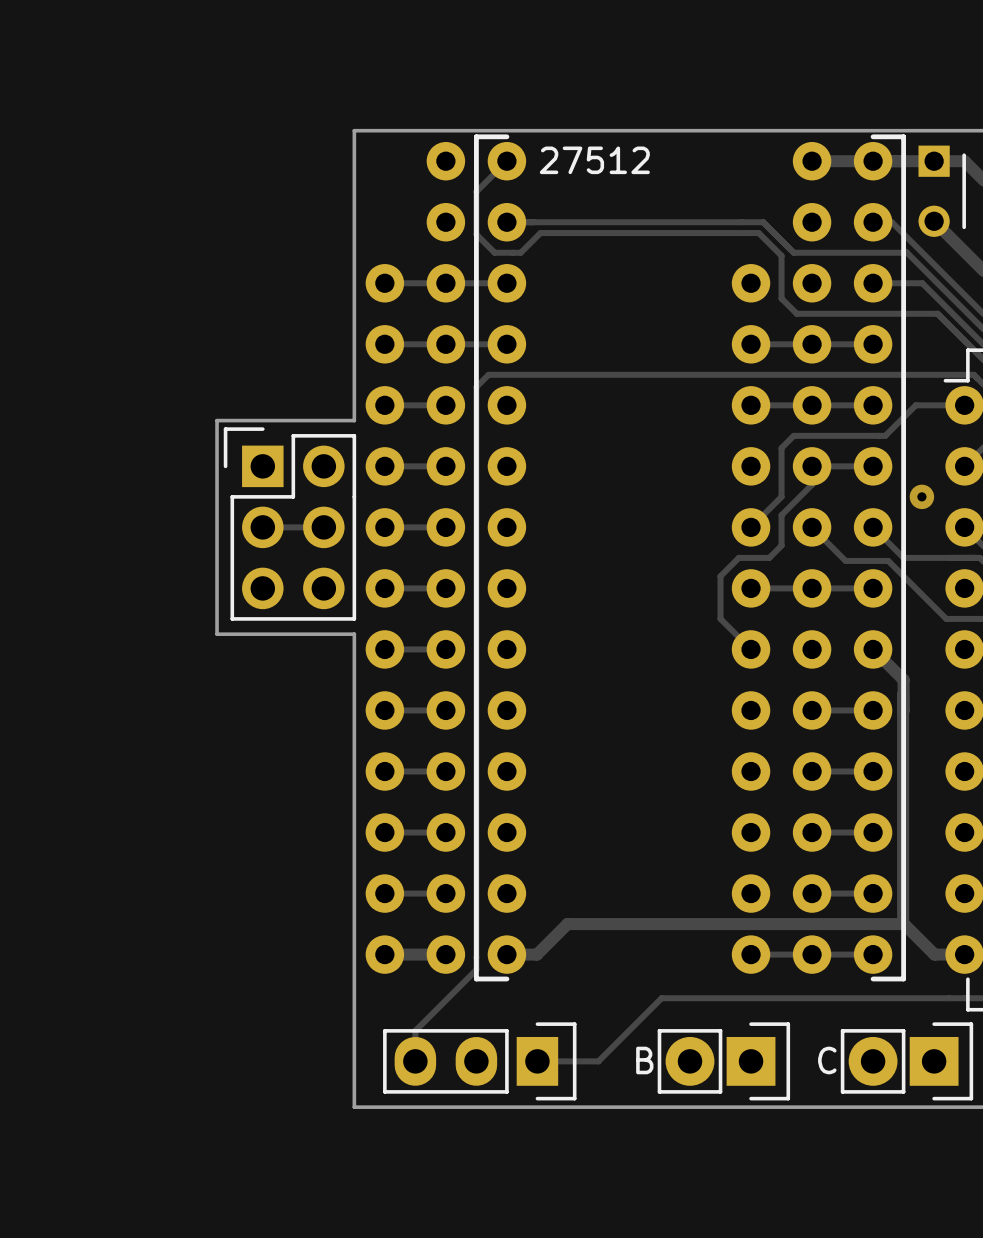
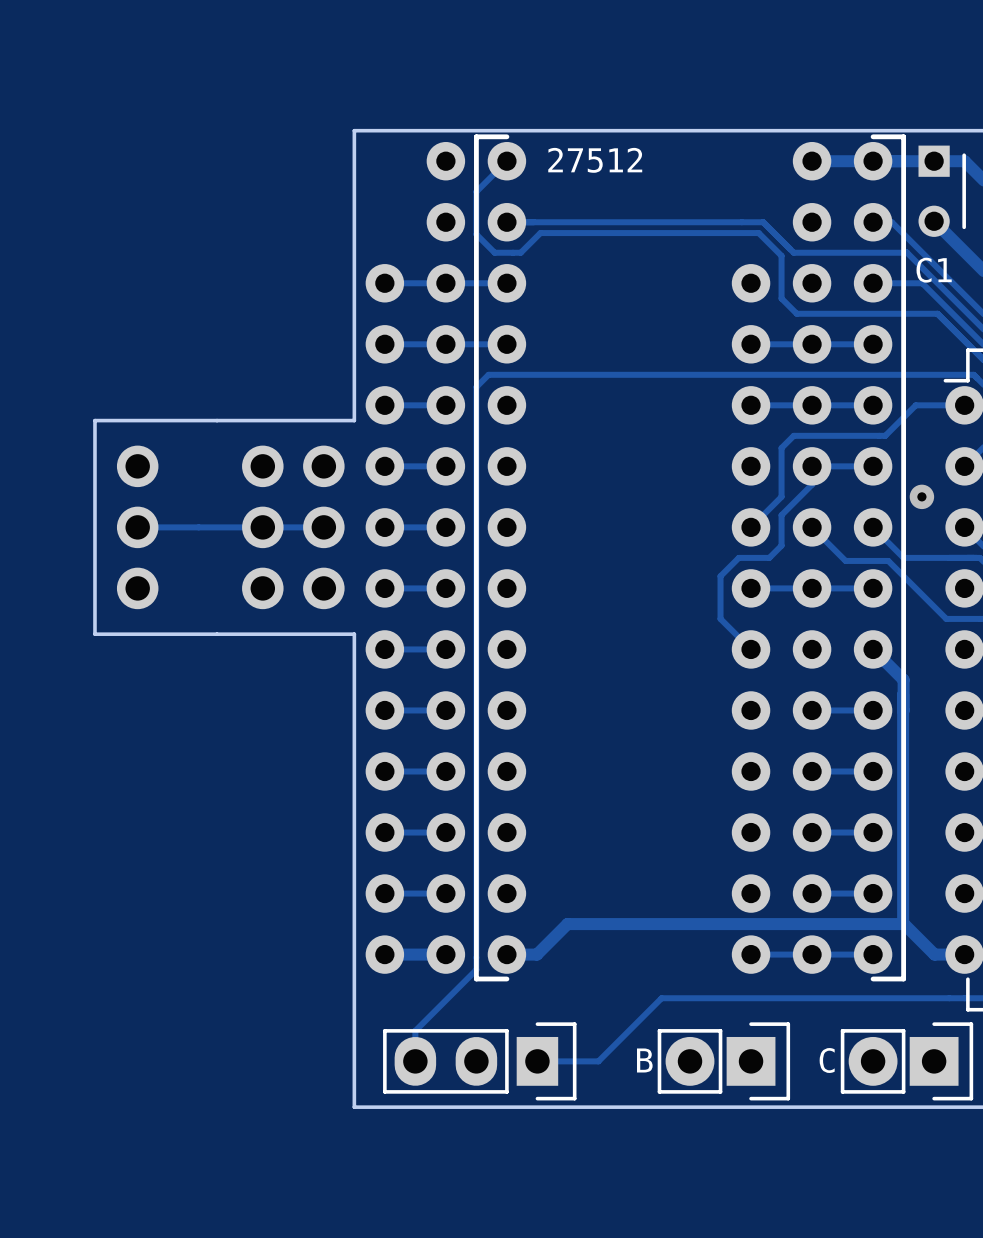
C1 name: none -> C1 (934, 270)
board edge: (217, 420) (217, 634) -> (217, 420) (94, 420) (94, 634) (217, 634)
part footprint: [223, 427, 357, 621] -> [242, 445, 345, 610]
track: none -> (137, 527) (262, 527)
part: none -> (137, 527)

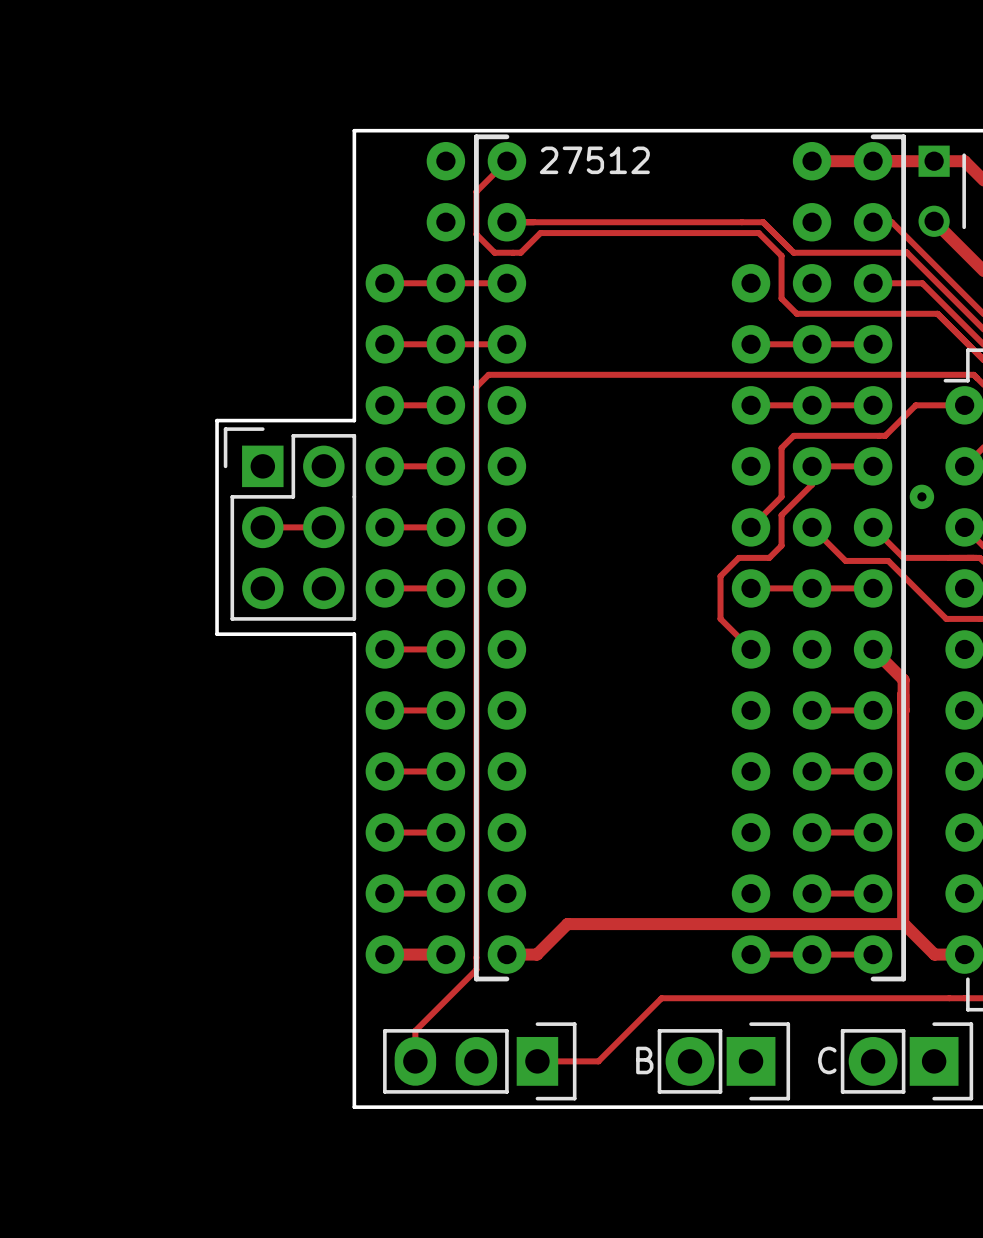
C1 name: C1 (934, 270) -> none
board edge: (217, 420) (94, 420) (94, 634) (217, 634) -> (217, 420) (217, 634)
part footprint: [242, 445, 345, 610] -> [223, 427, 357, 621]
track: (137, 527) (262, 527) -> none
part: (137, 527) -> none

